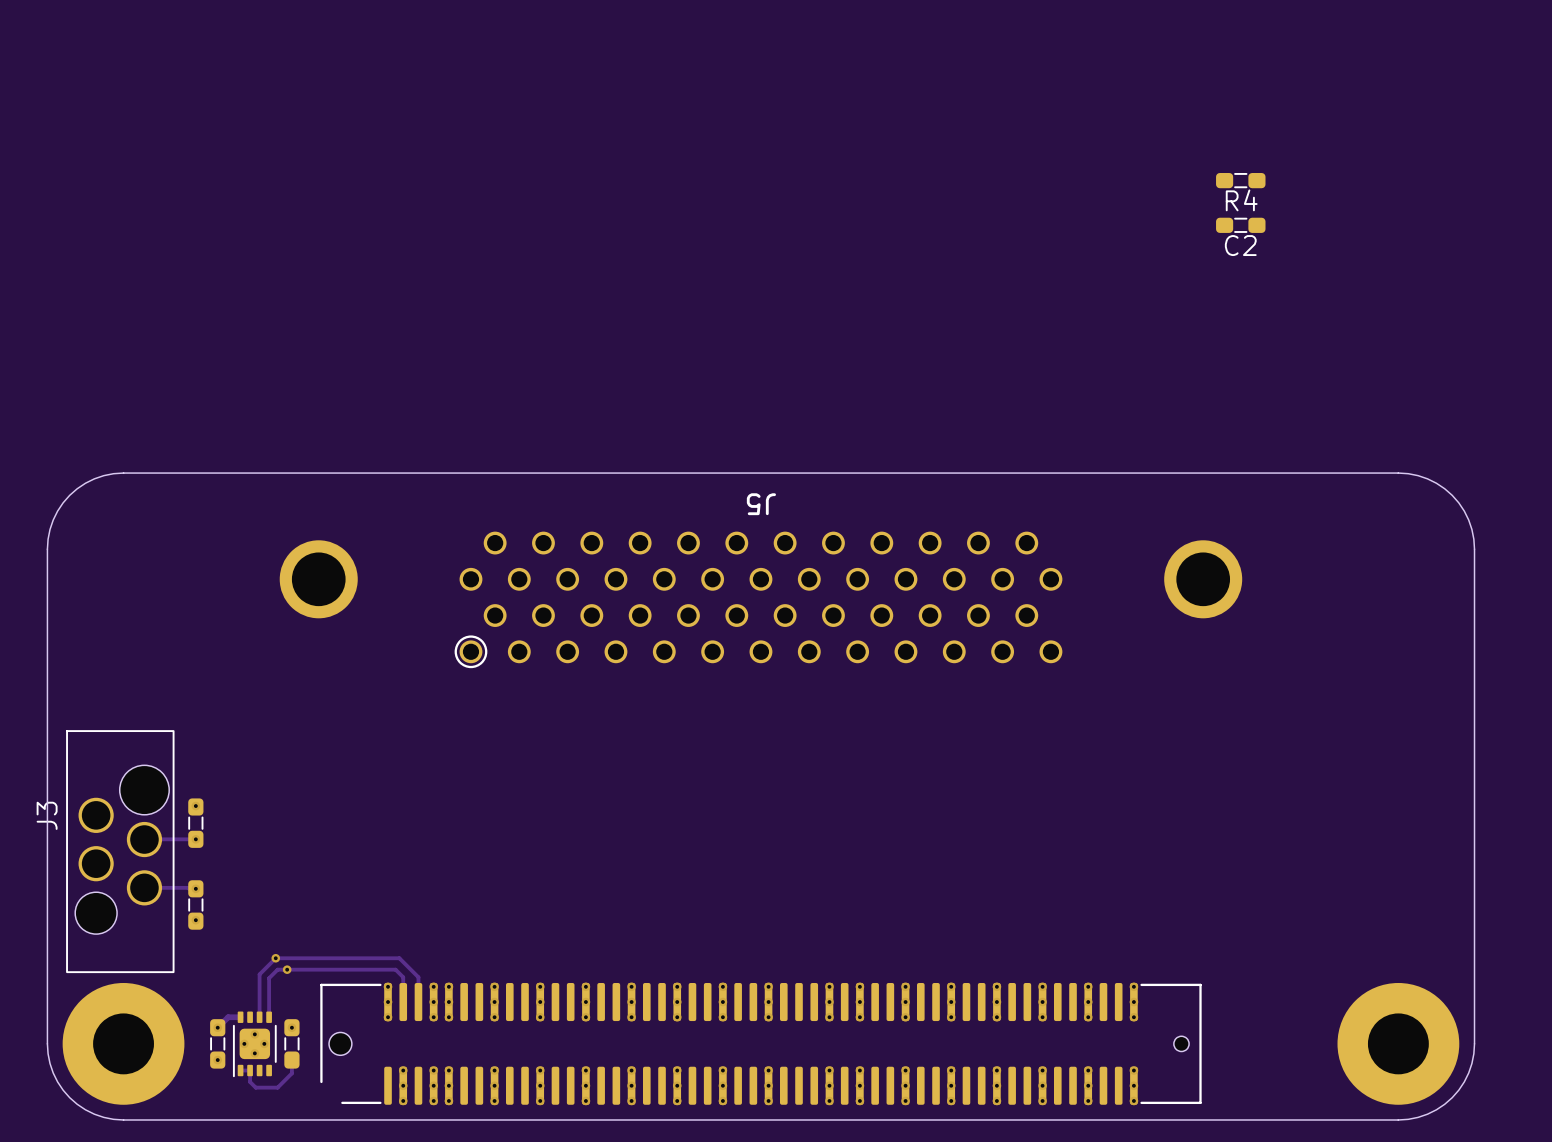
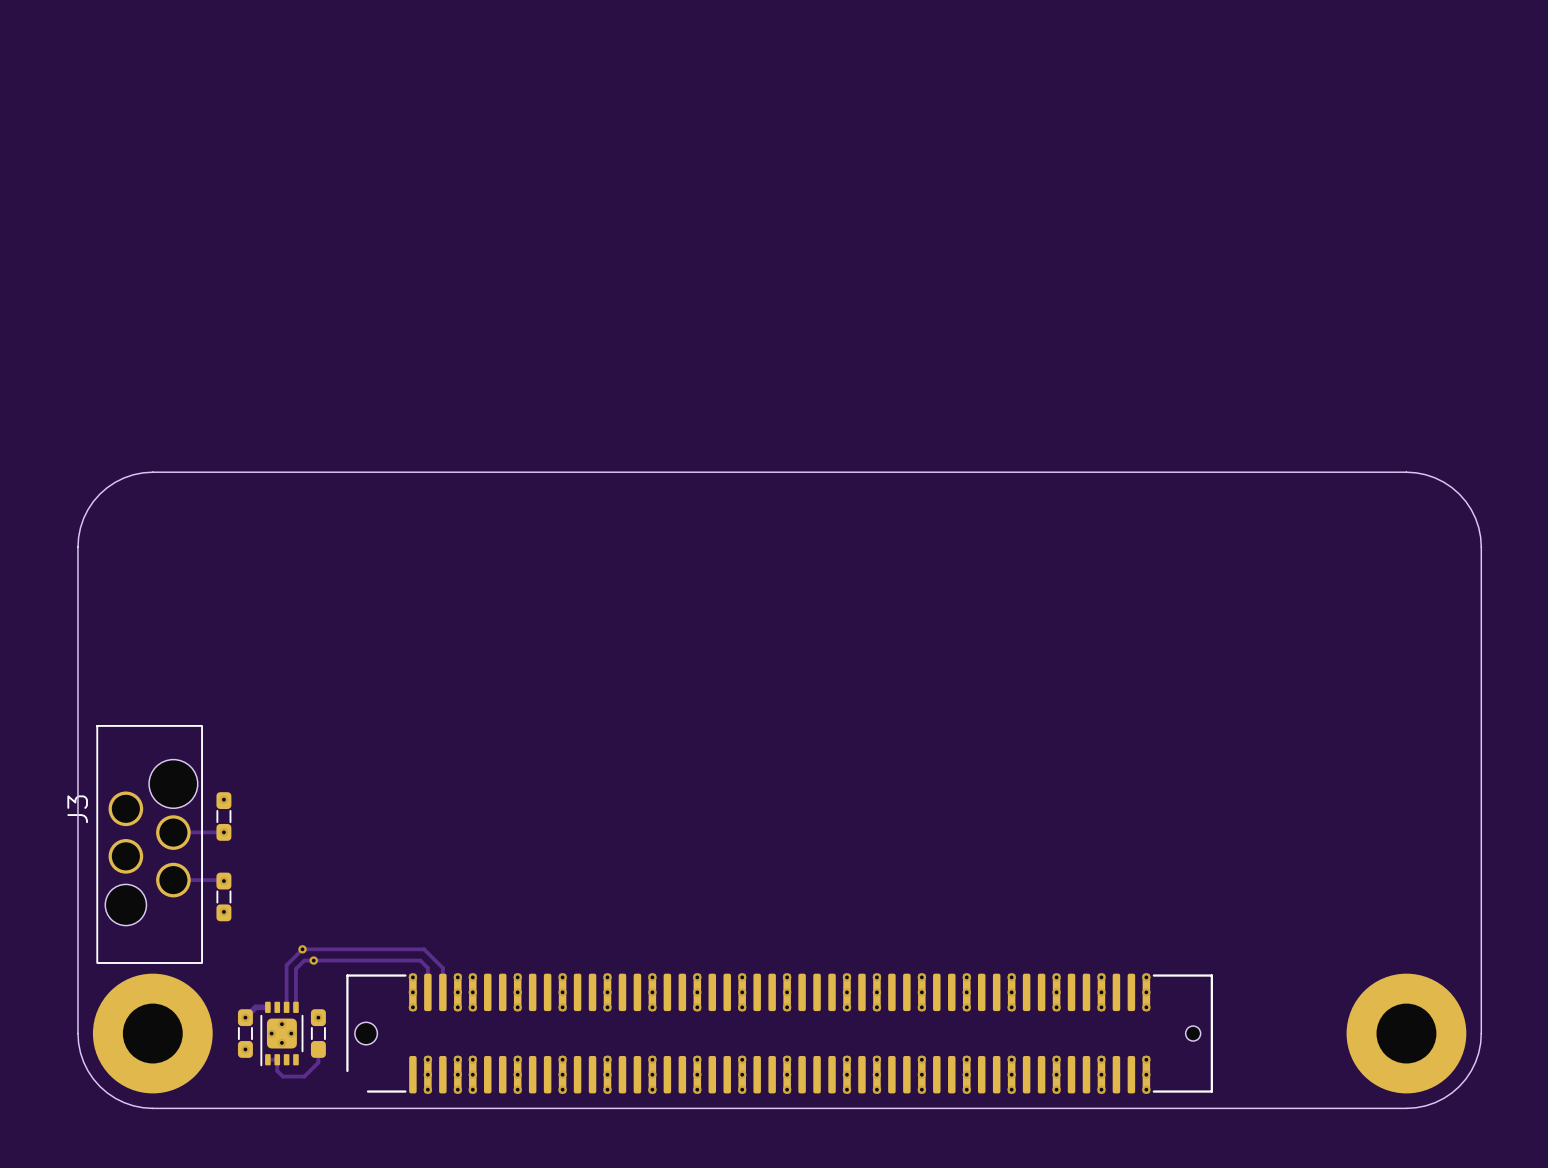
R4: (1240, 180) -> none
C2: (1240, 225) -> none
J5: (760, 599) -> none

